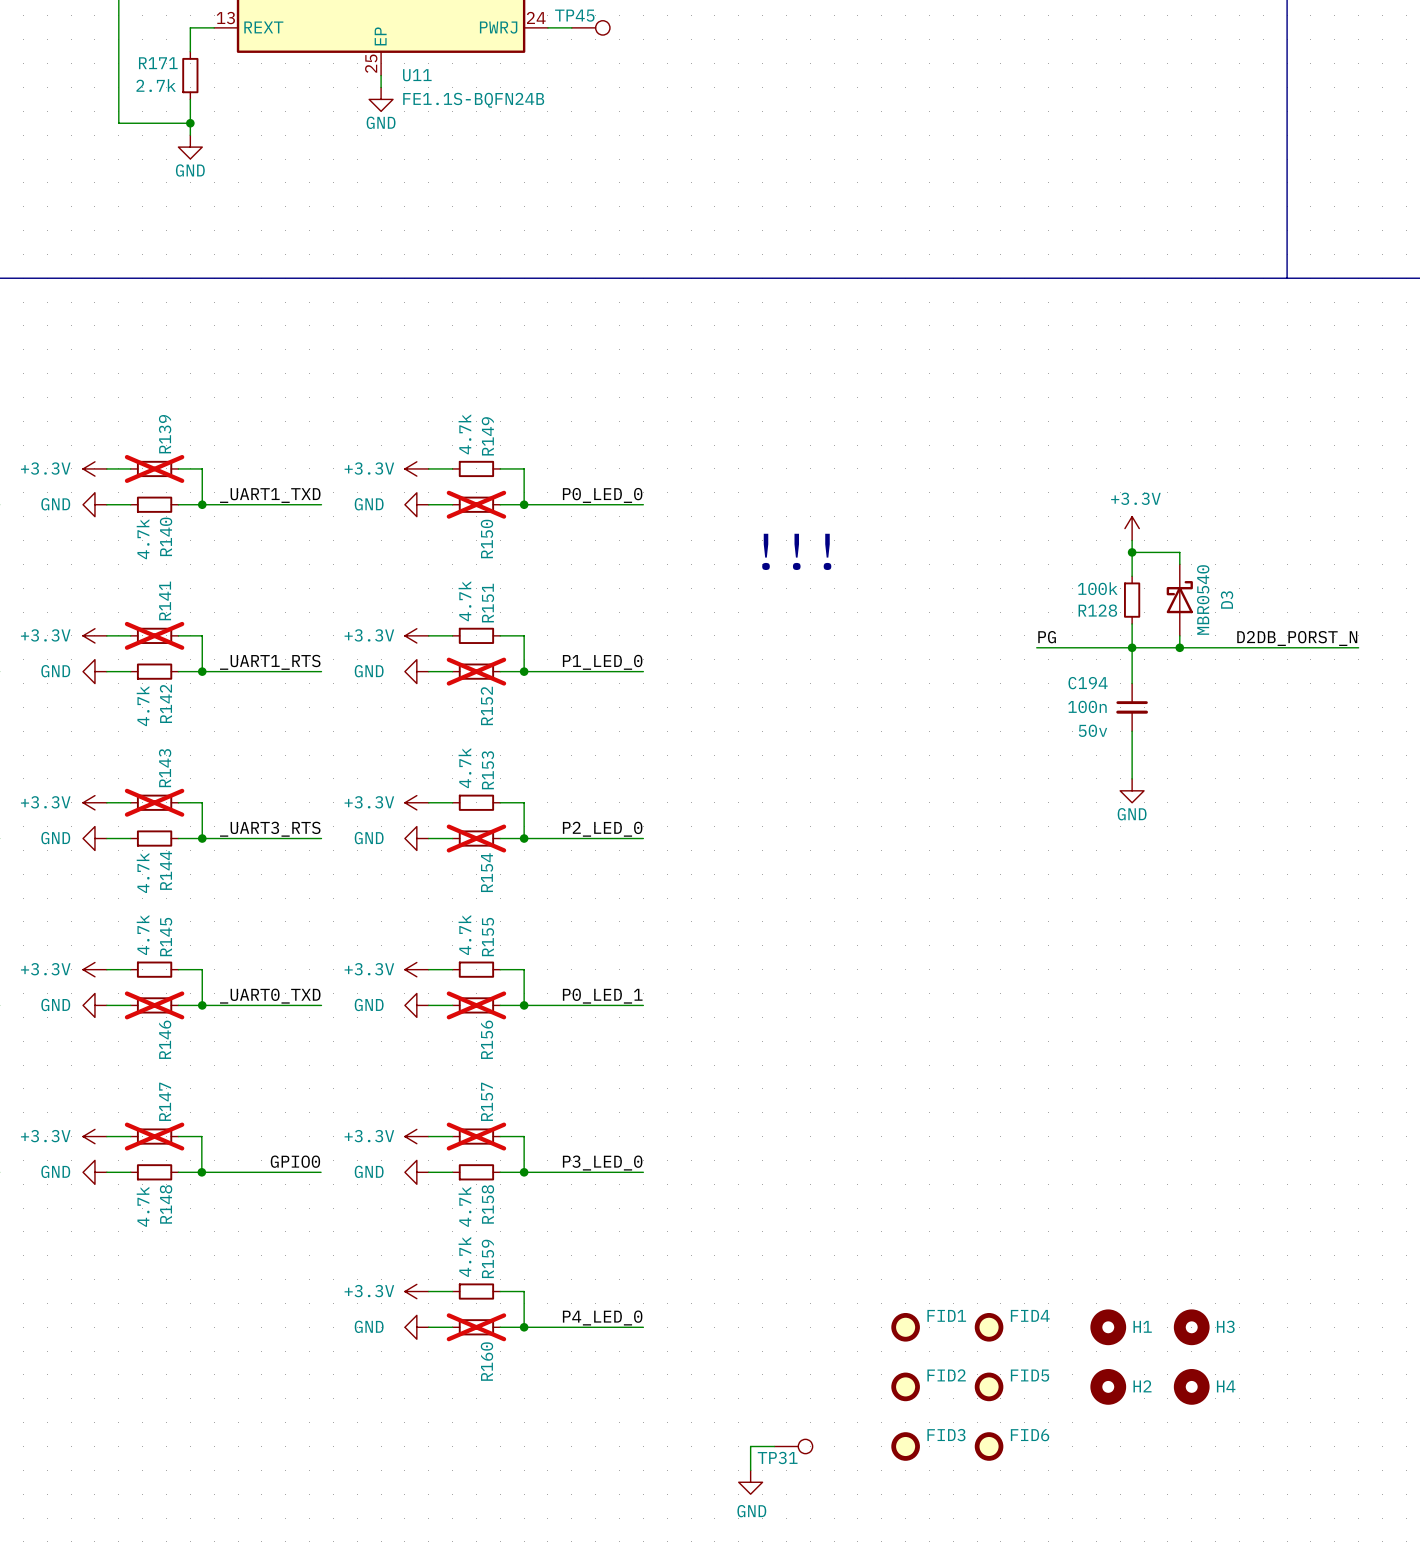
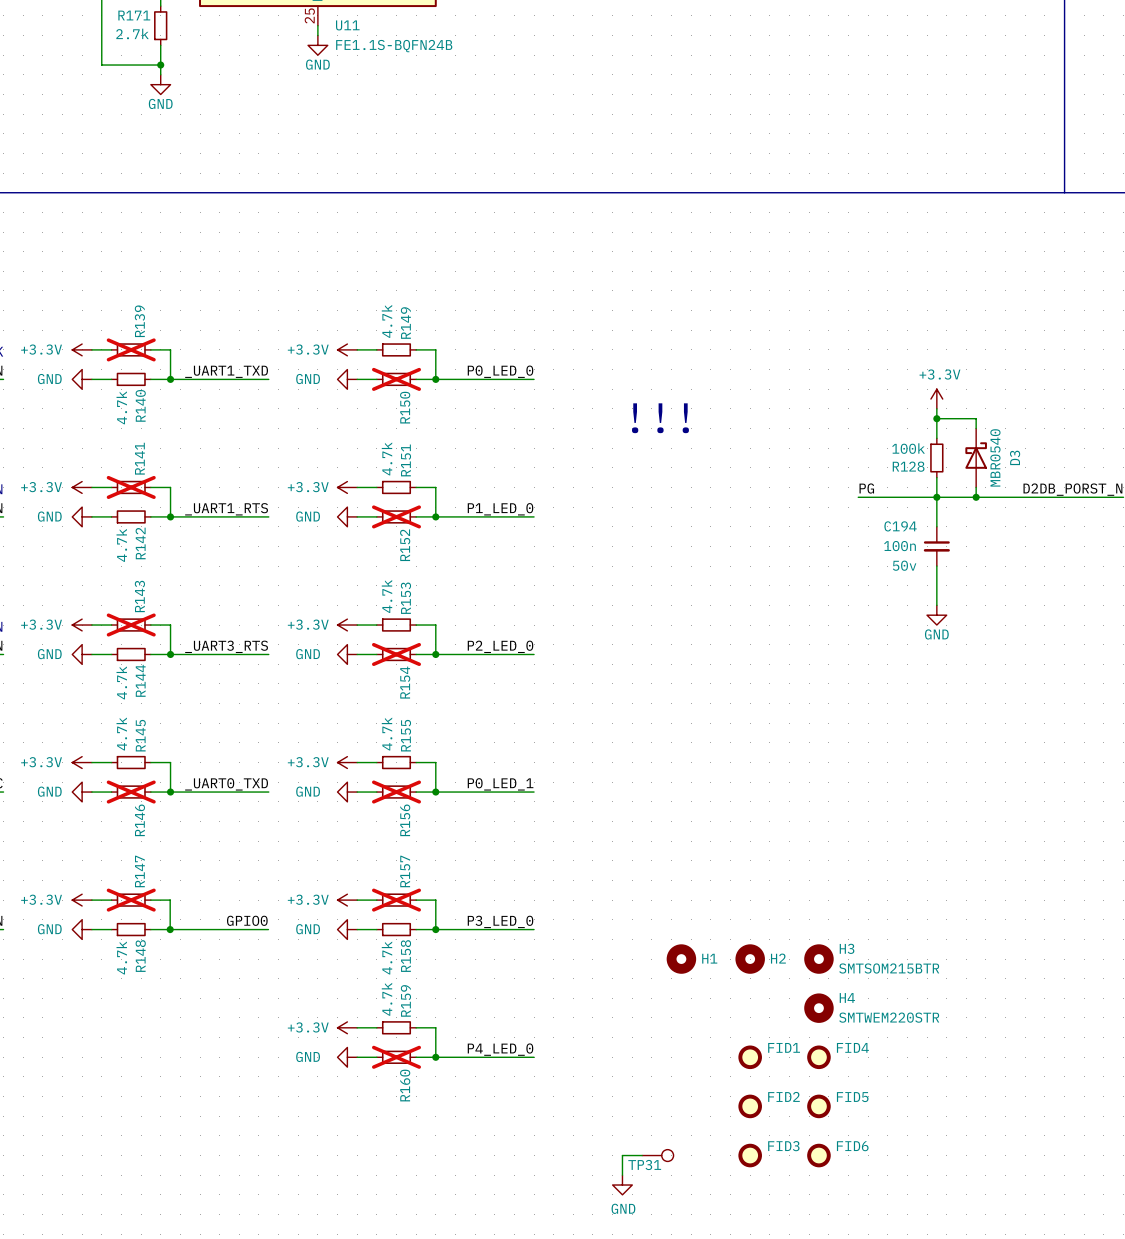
H3 value: none -> SMTSOM215BTR (889, 968)
H4 value: none -> SMTWEM220STR (889, 1017)
H3 name position: H3 (1225, 1326) -> H3 (847, 948)
H1 position: (1108, 1327) -> (681, 959)
H3 position: (1191, 1327) -> (818, 959)
H2 position: (1108, 1386) -> (750, 959)
H4 position: (1191, 1386) -> (818, 1008)
H4 name position: H4 (1226, 1386) -> H4 (847, 997)

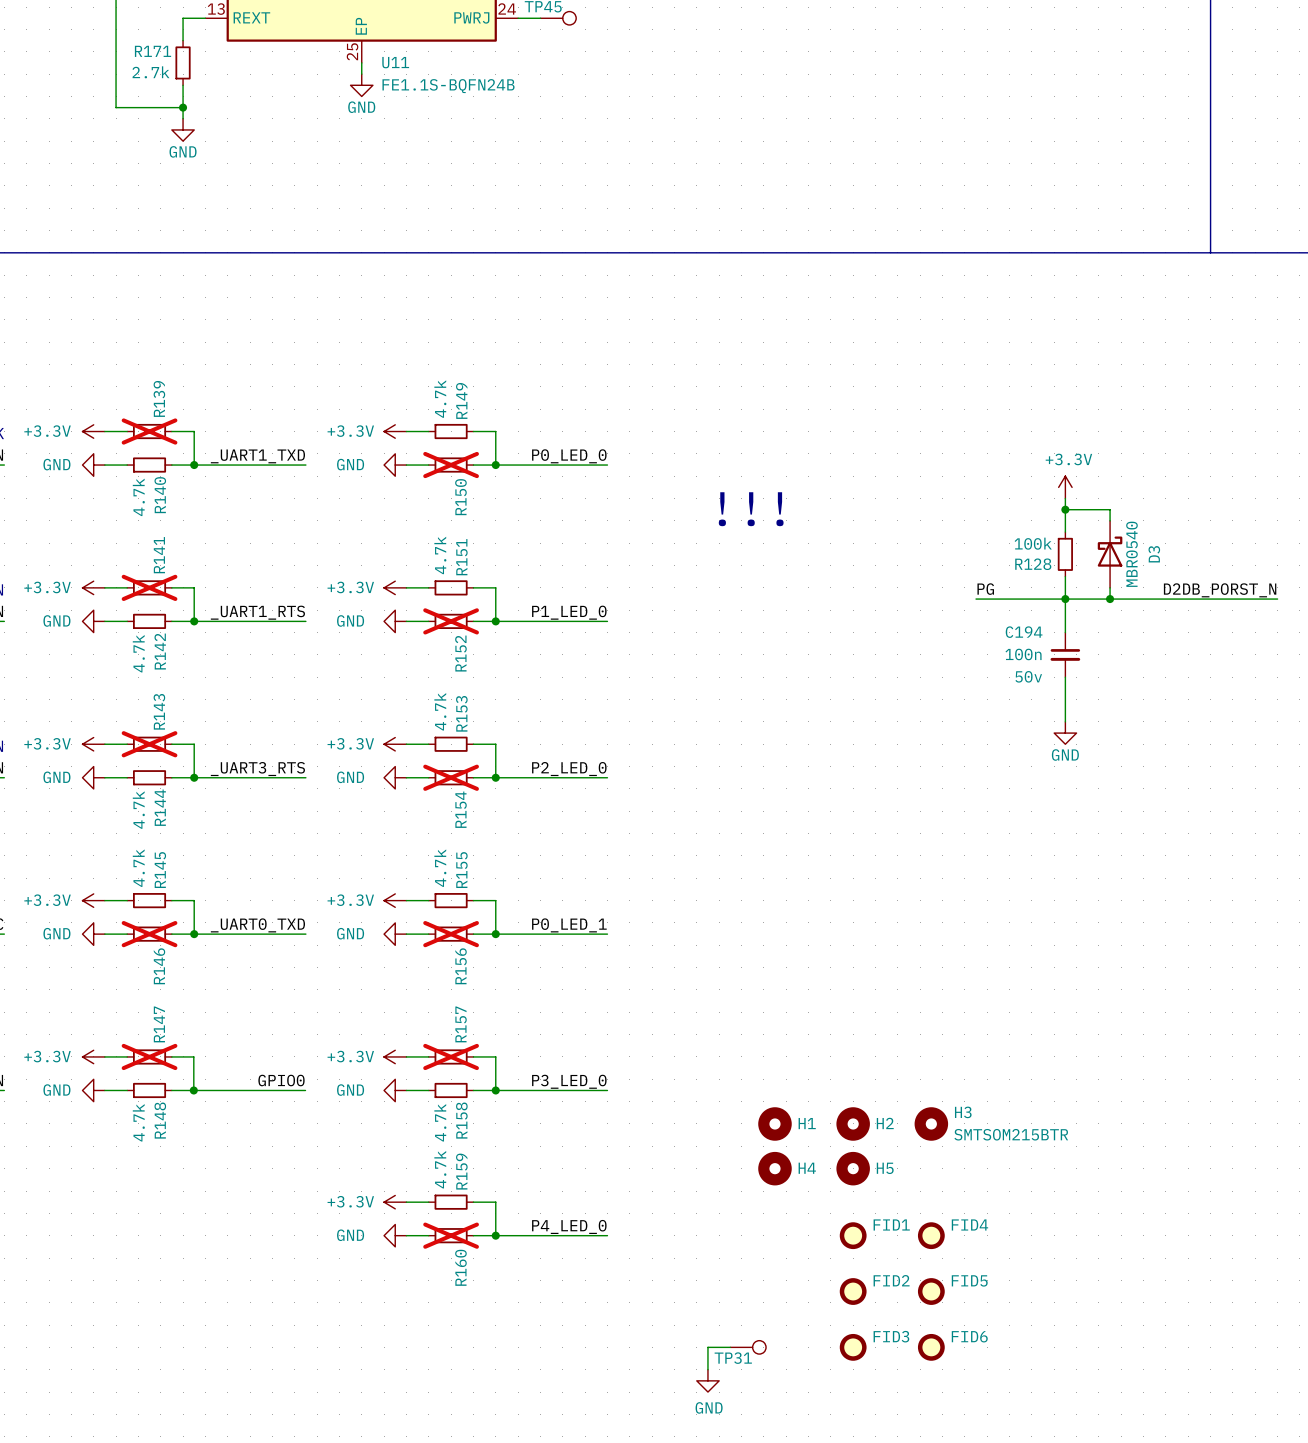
H4 name position: H4 (847, 997) -> H4 (807, 1168)
H5: none -> (853, 1168)
H4 position: (818, 1008) -> (774, 1168)
H4 value: SMTWEM220STR (889, 1017) -> none

